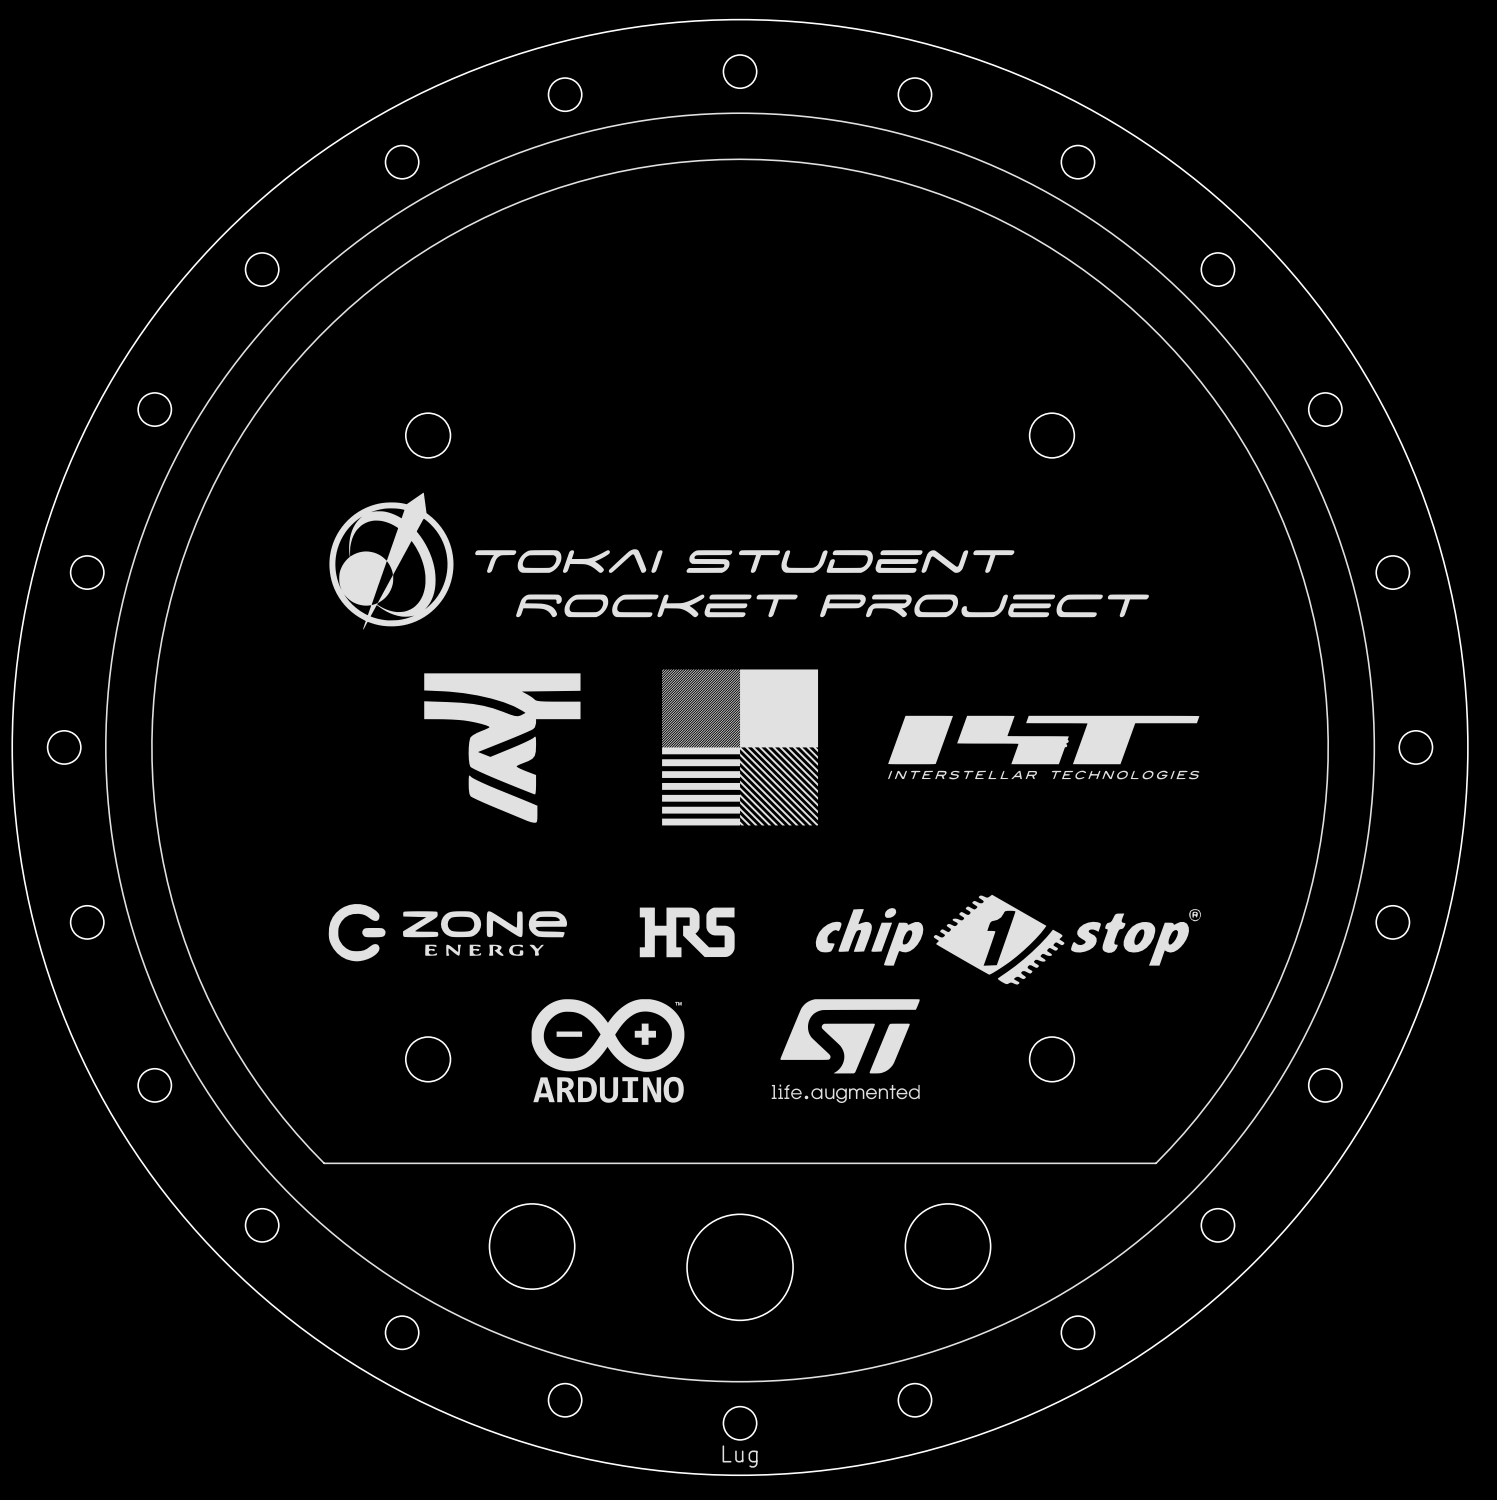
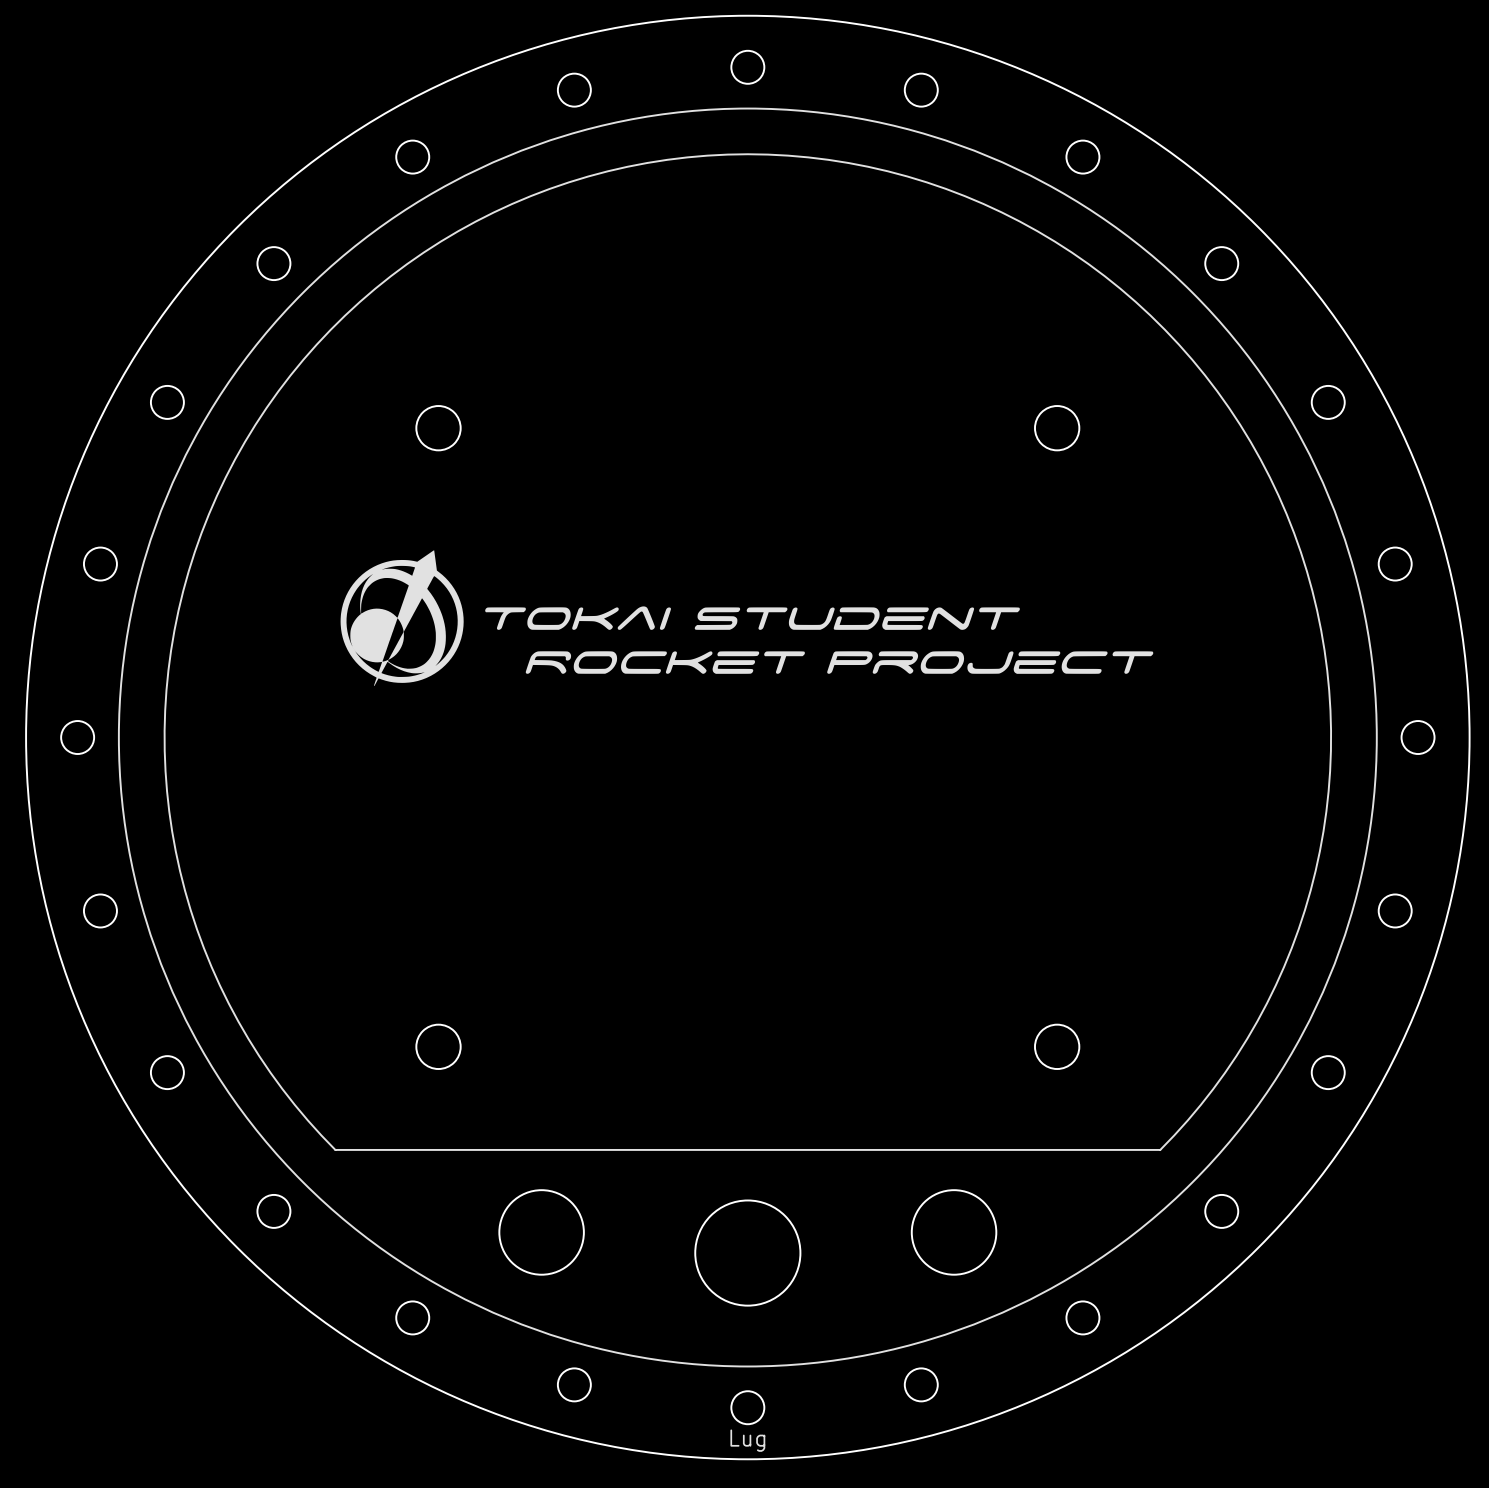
drawing position: (739, 561) -> (746, 618)
drawing: [662, 669, 819, 826] -> none
drawing: [424, 673, 581, 823] -> none
part: (1043, 747) -> none
drawing: [815, 894, 1201, 985] -> none
drawing: [328, 904, 568, 962] -> none
drawing: [639, 907, 735, 958] -> none
drawing: [531, 999, 685, 1103] -> none
drawing: [771, 999, 920, 1104] -> none

